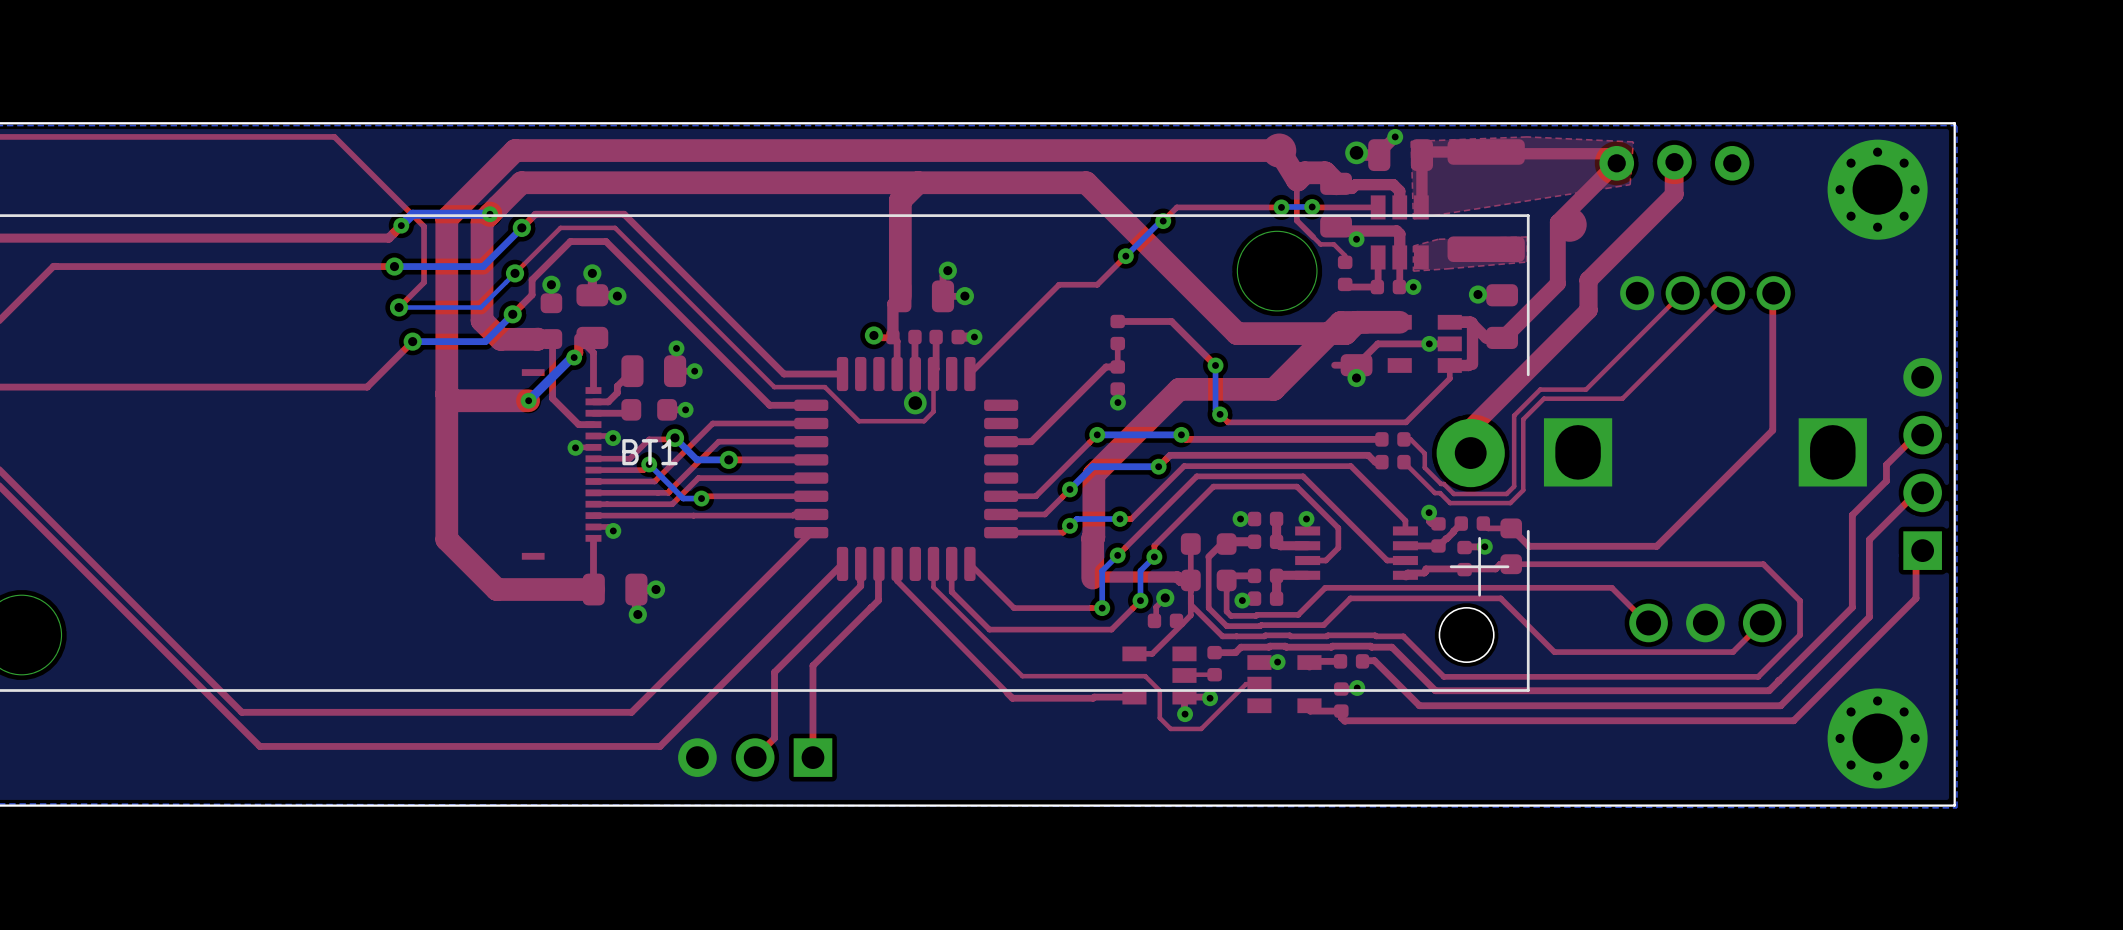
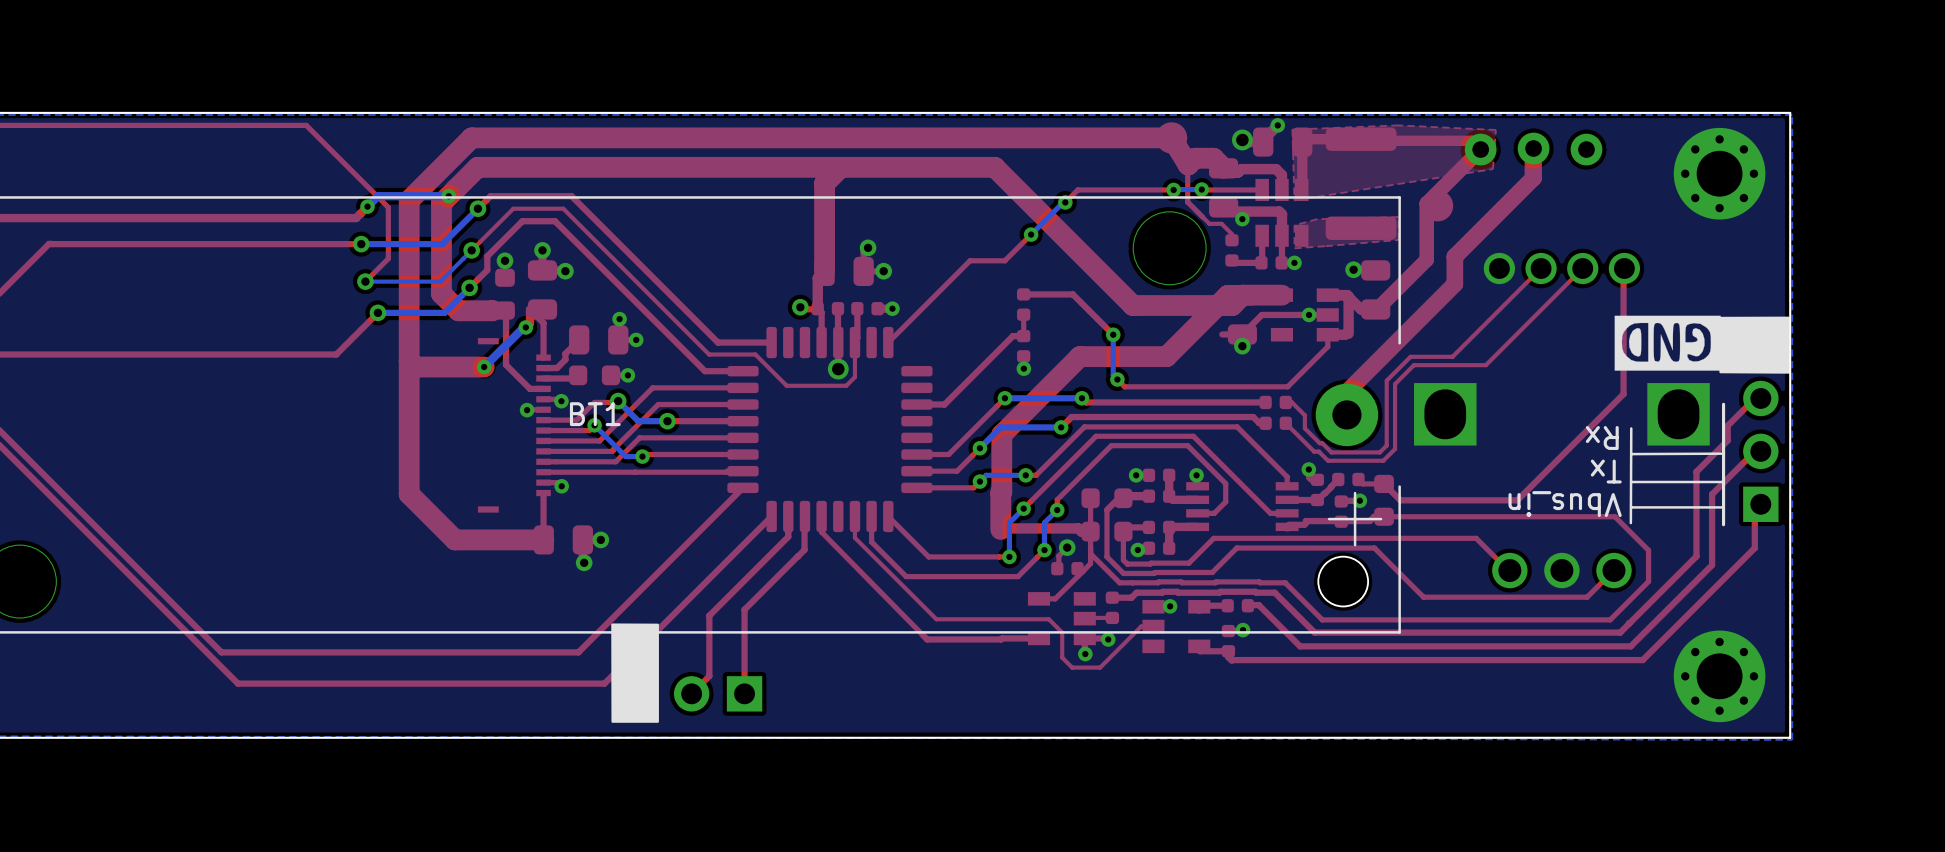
drawing: none -> [1614, 315, 1791, 374]
line: none -> (1723, 404) (1723, 524)
line: none -> (1631, 428) (1630, 523)
text: none -> Rx (1602, 438)
line: none -> (1723, 453) (1631, 454)
text: none -> Tx (1606, 471)
line: none -> (1723, 482) (1631, 482)
text: none -> Vbus_in (1565, 504)
line: none -> (1722, 507) (1631, 507)
drawing: none -> [611, 623, 659, 723]

